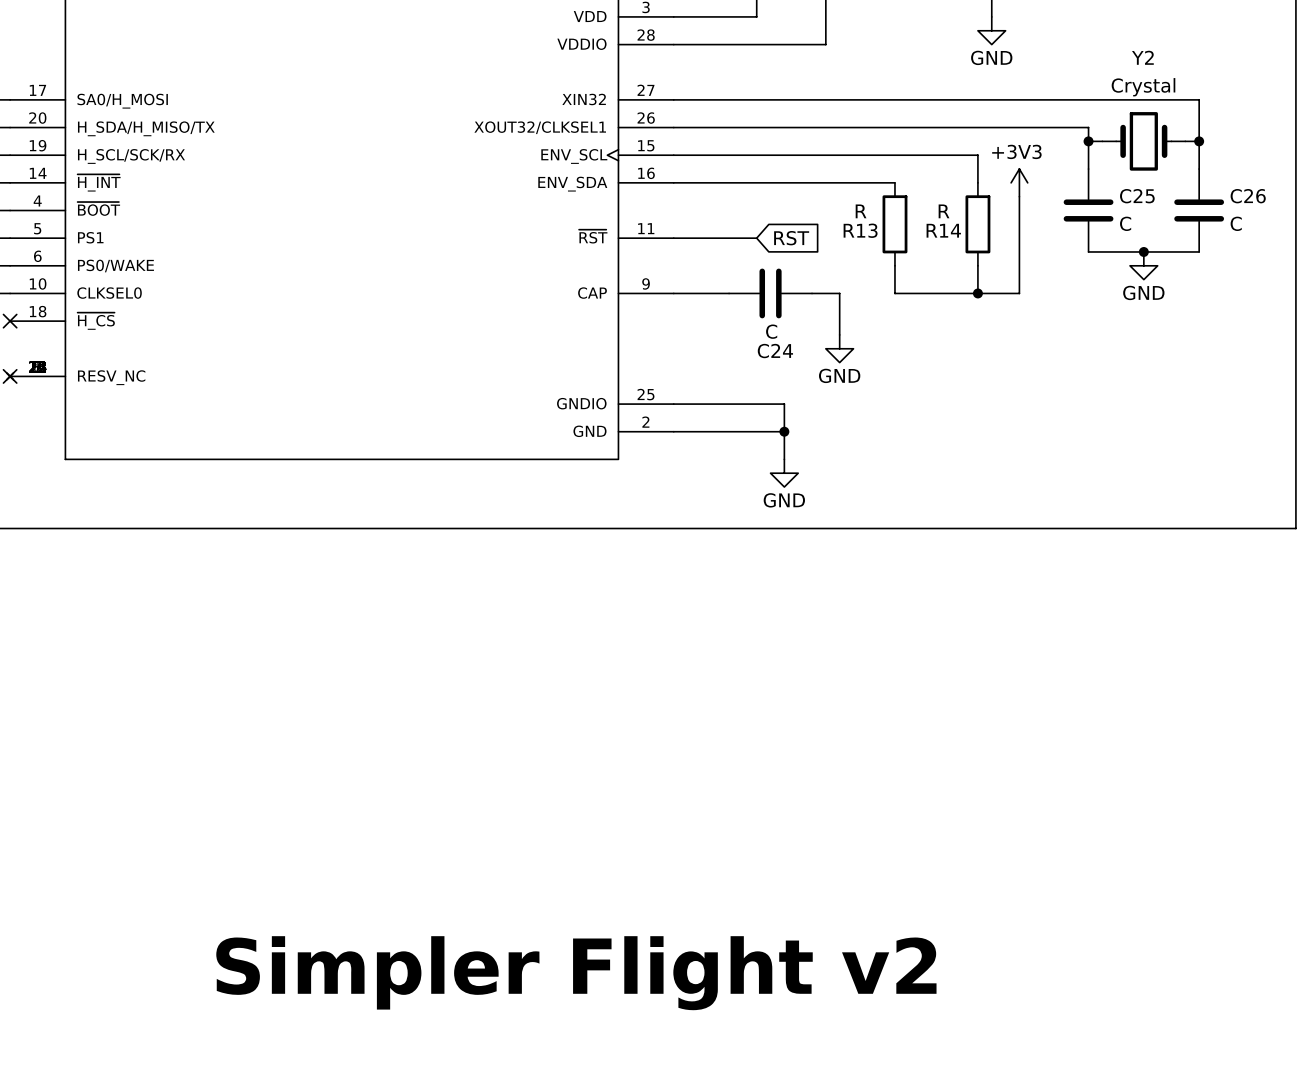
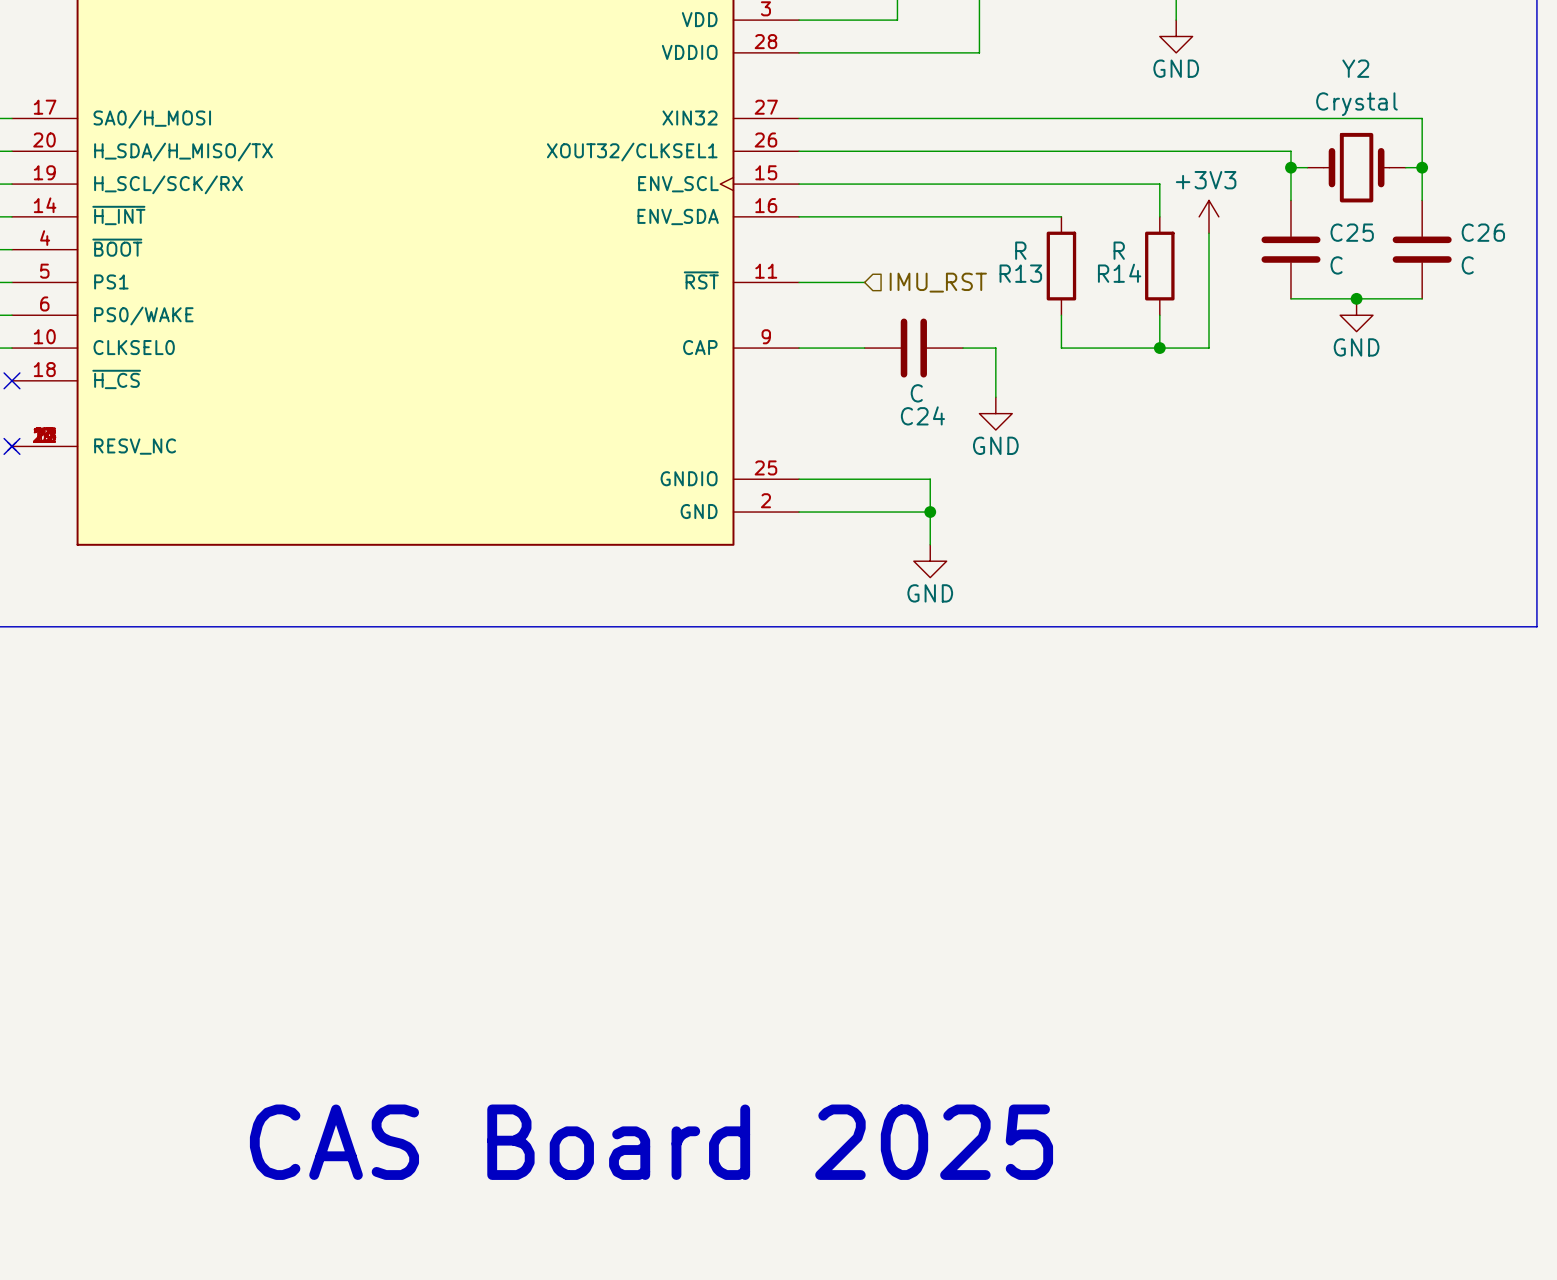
wire: (729, 238) (756, 238) -> none
global label: RST (791, 238) -> none
hierarchical label: none -> IMU_RST (938, 282)
text: none -> CAS Board 2025 (651, 1142)
text: Simpler Flight v2 (576, 973) -> none

